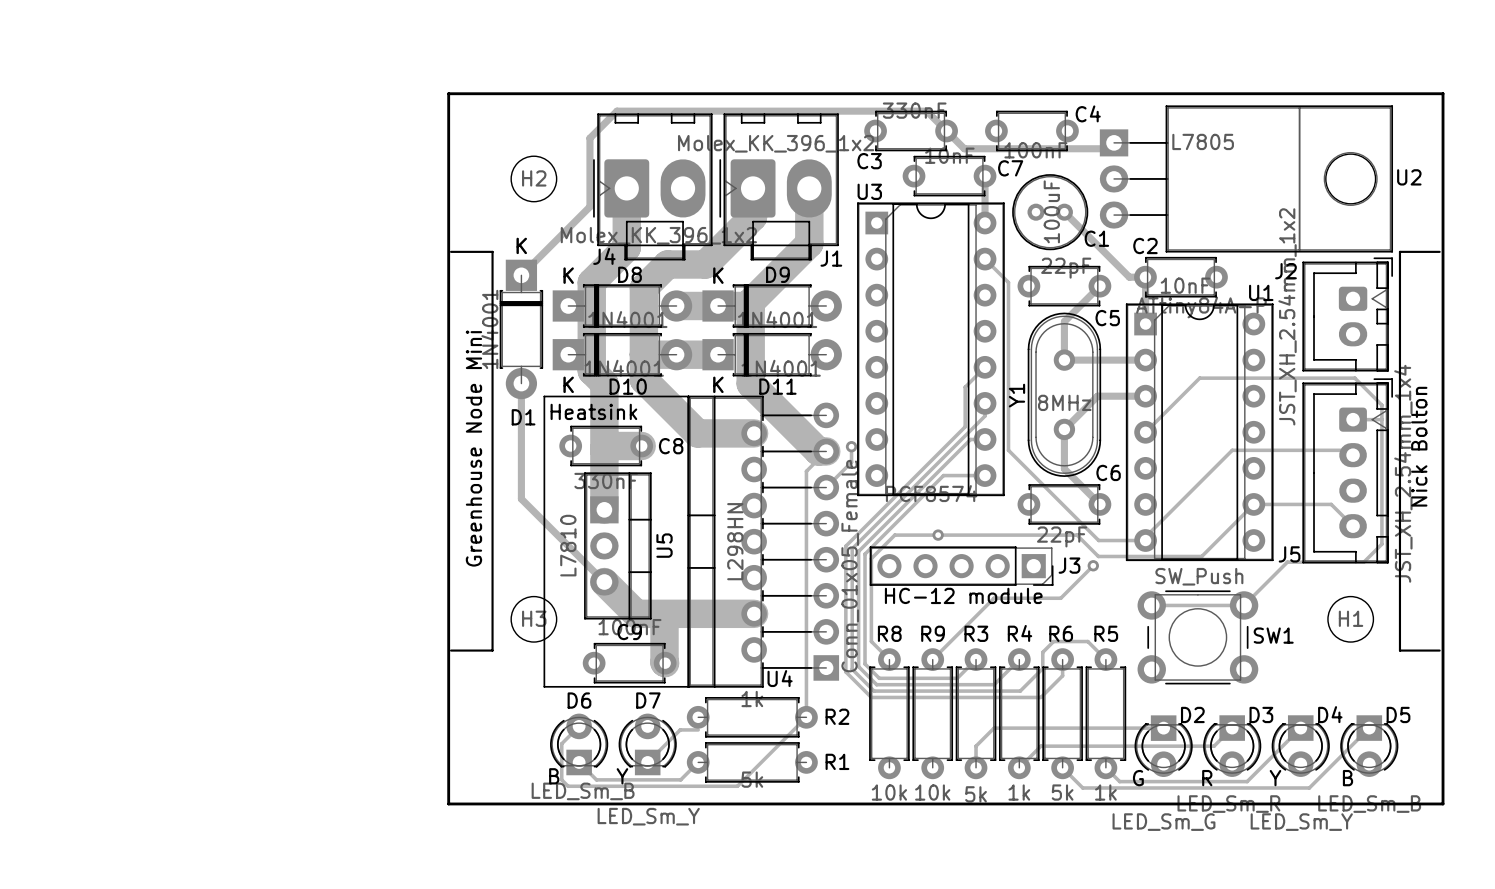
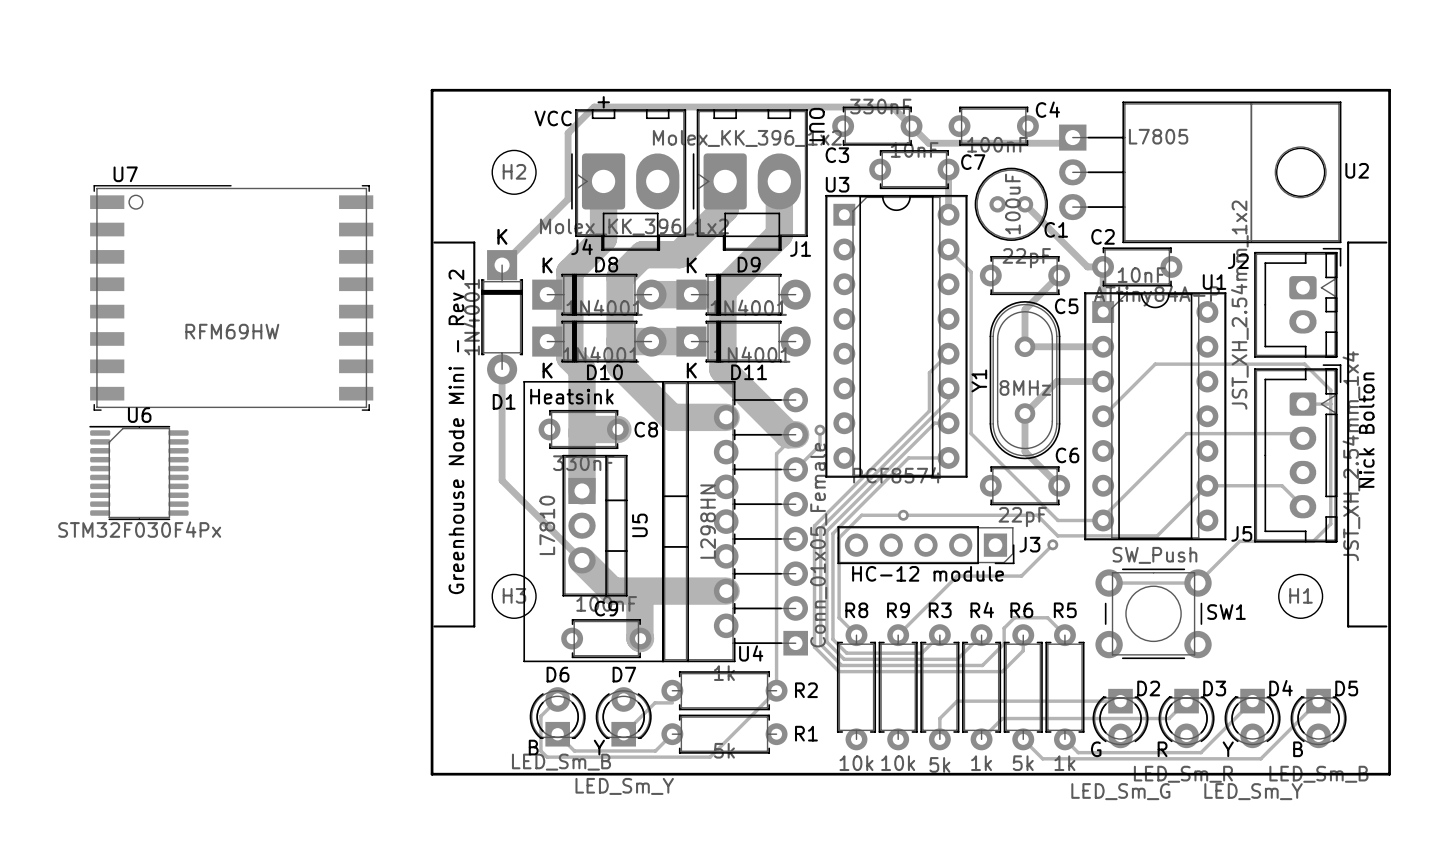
text: none -> + (603, 102)
text: none -> VCC (553, 118)
text: none -> OUT (816, 126)
U7: none -> RFM69HW (231, 297)
text: Greenhouse Node Mini (473, 448) -> Greenhouse Node Mini - Rev 2 (456, 431)
U6: none -> STM32F030F4Px (138, 473)

